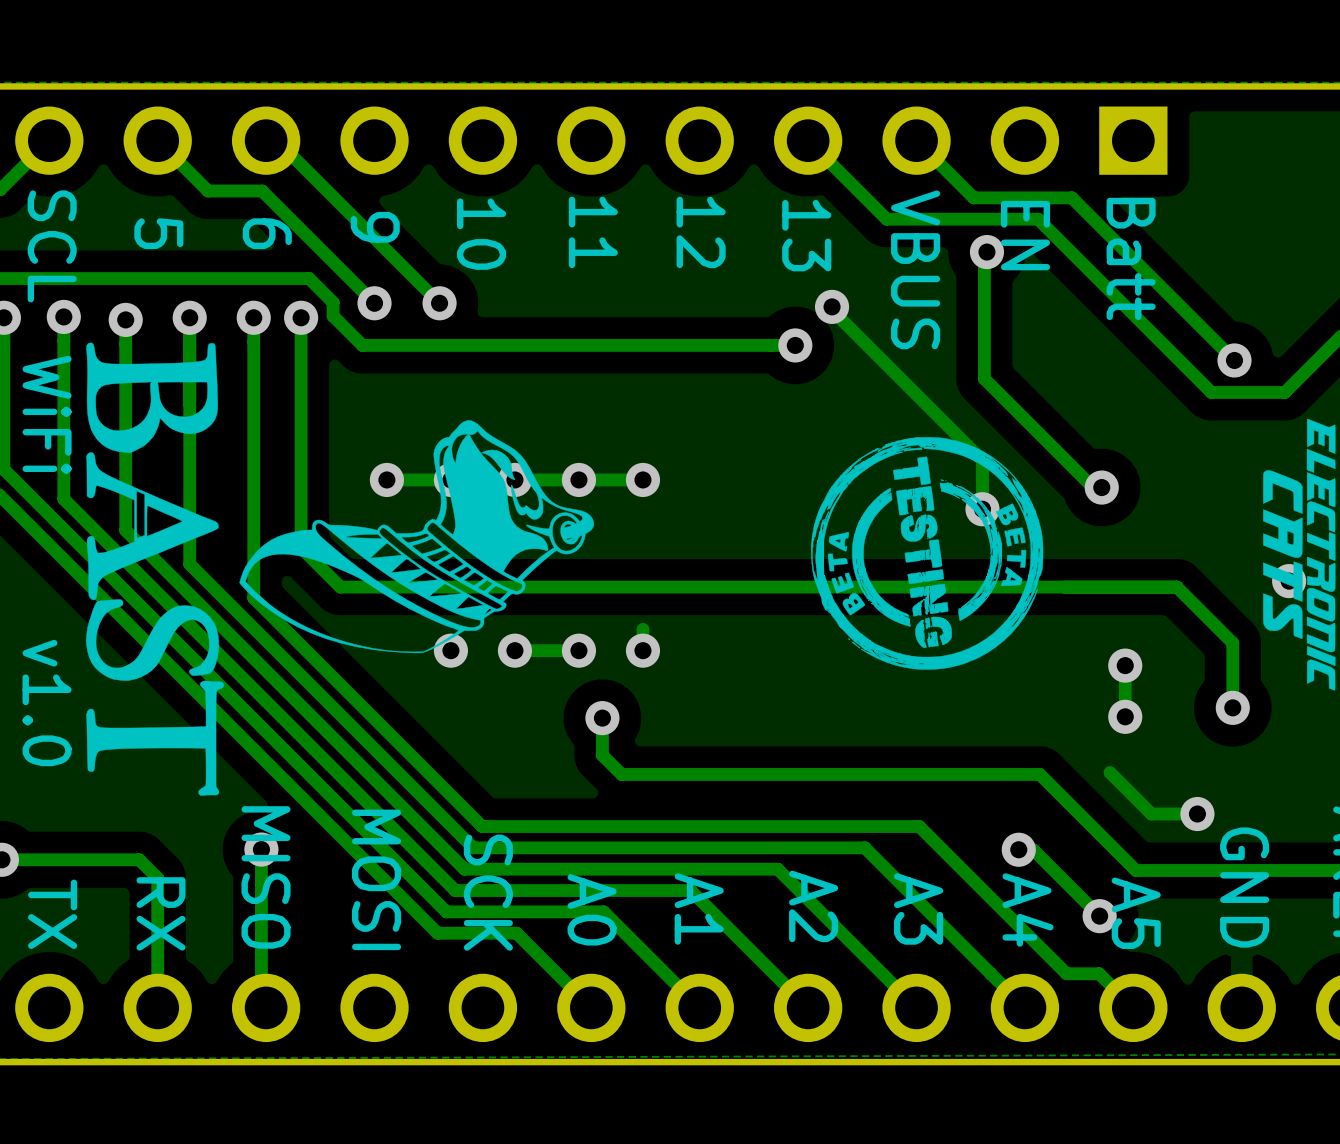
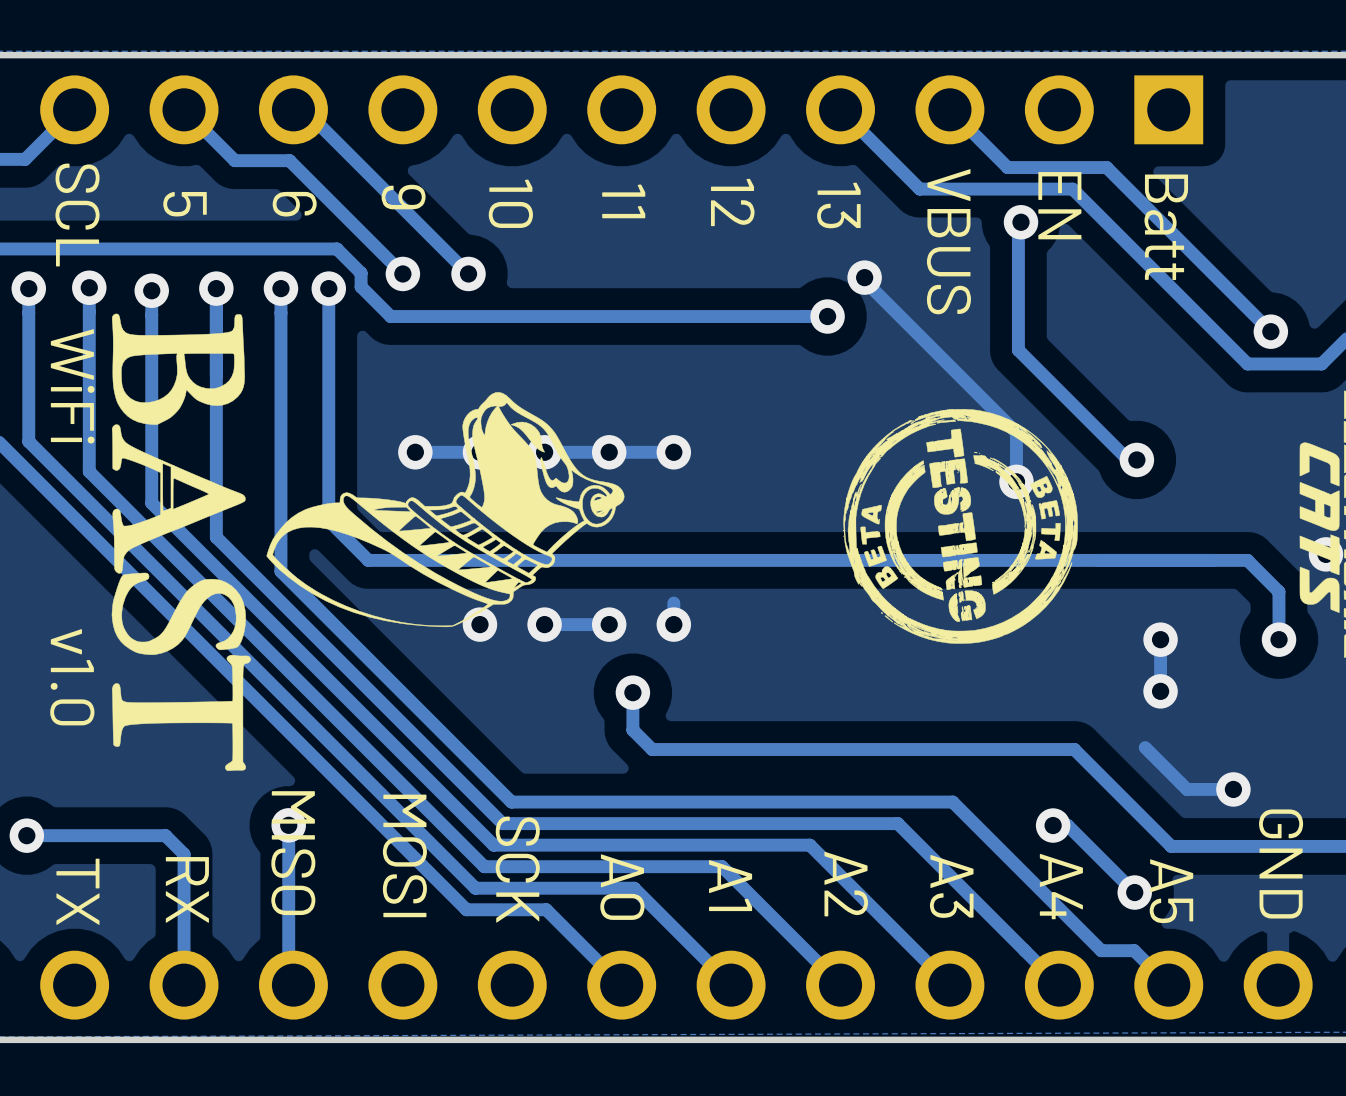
track: (1176, 587) (1232, 642) (1232, 707) -> (1212, 560) (1247, 560) (1278, 591) (1279, 639)
via position: (1232, 707) -> (1279, 639)

